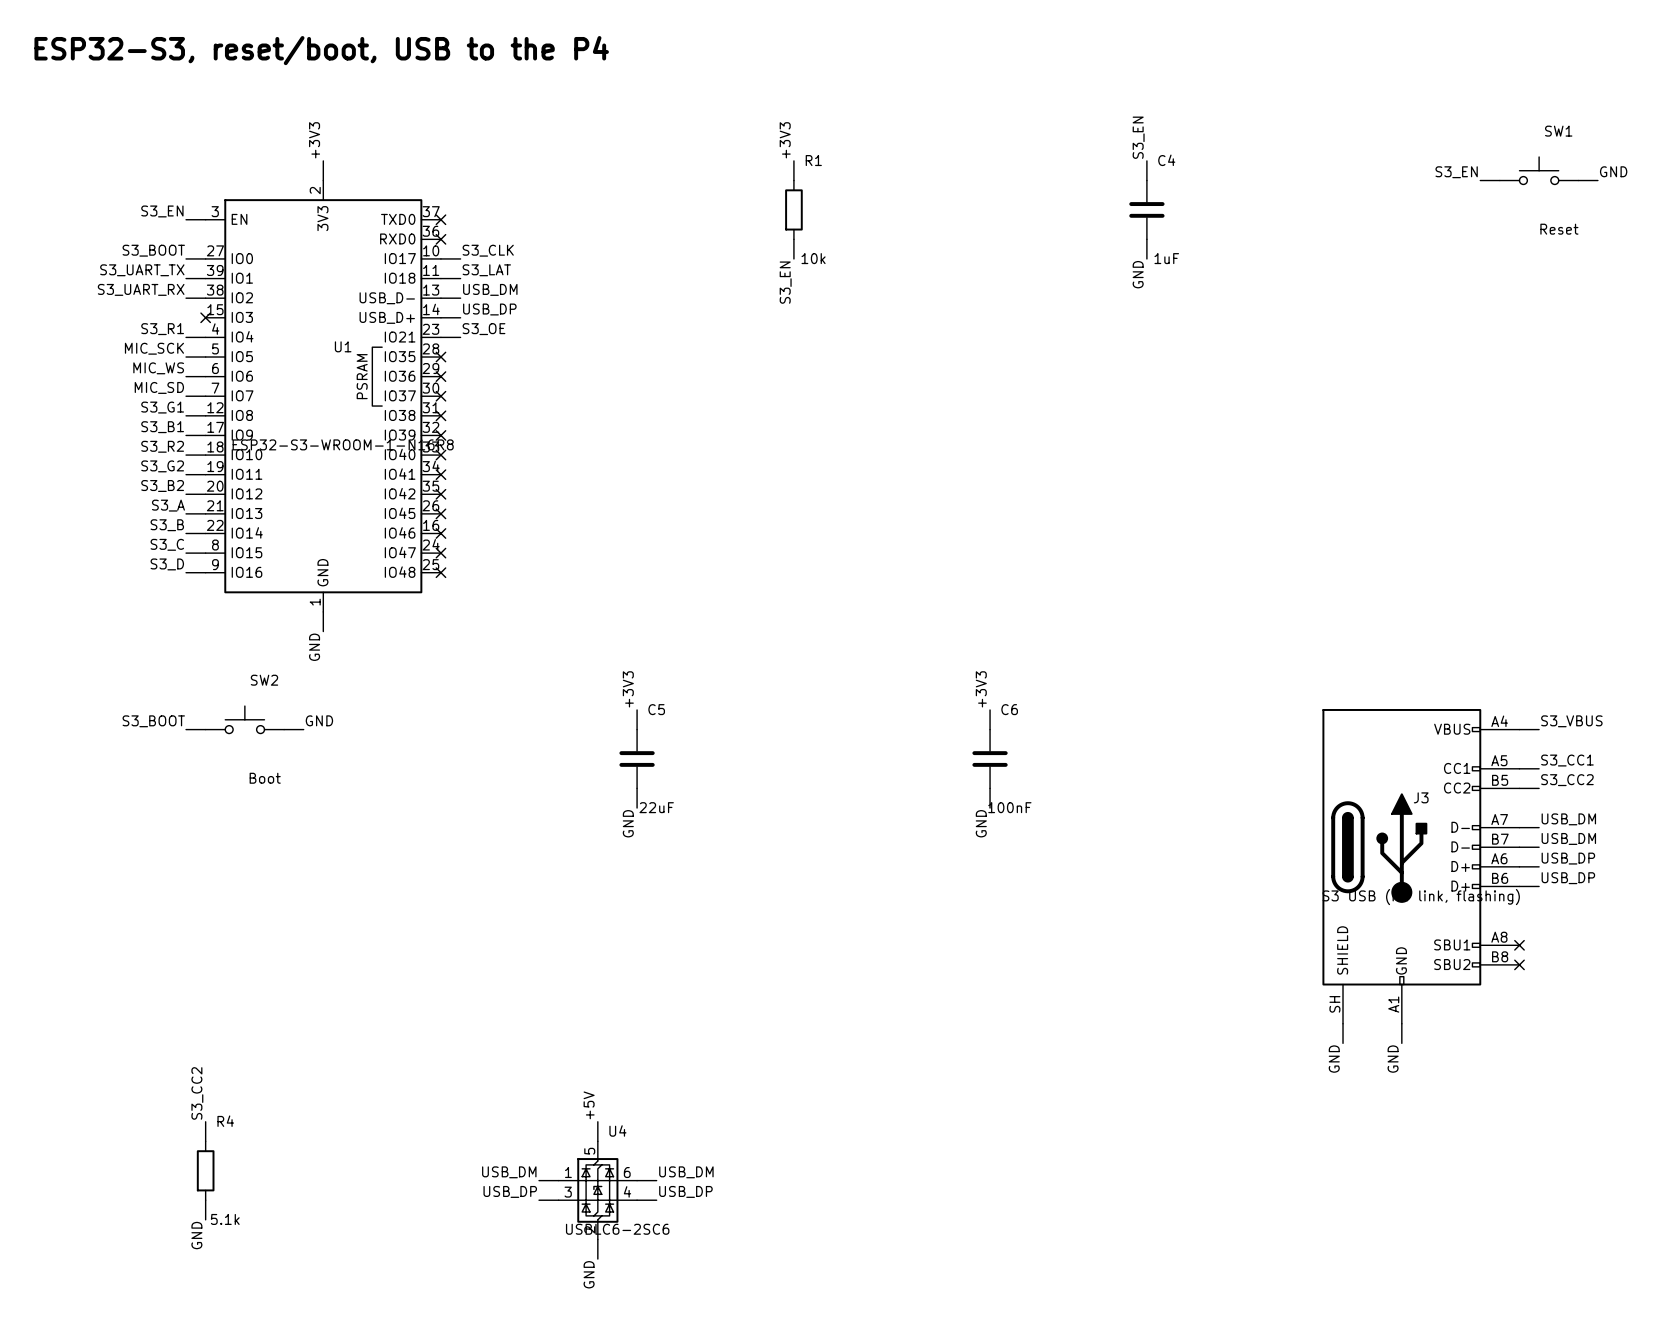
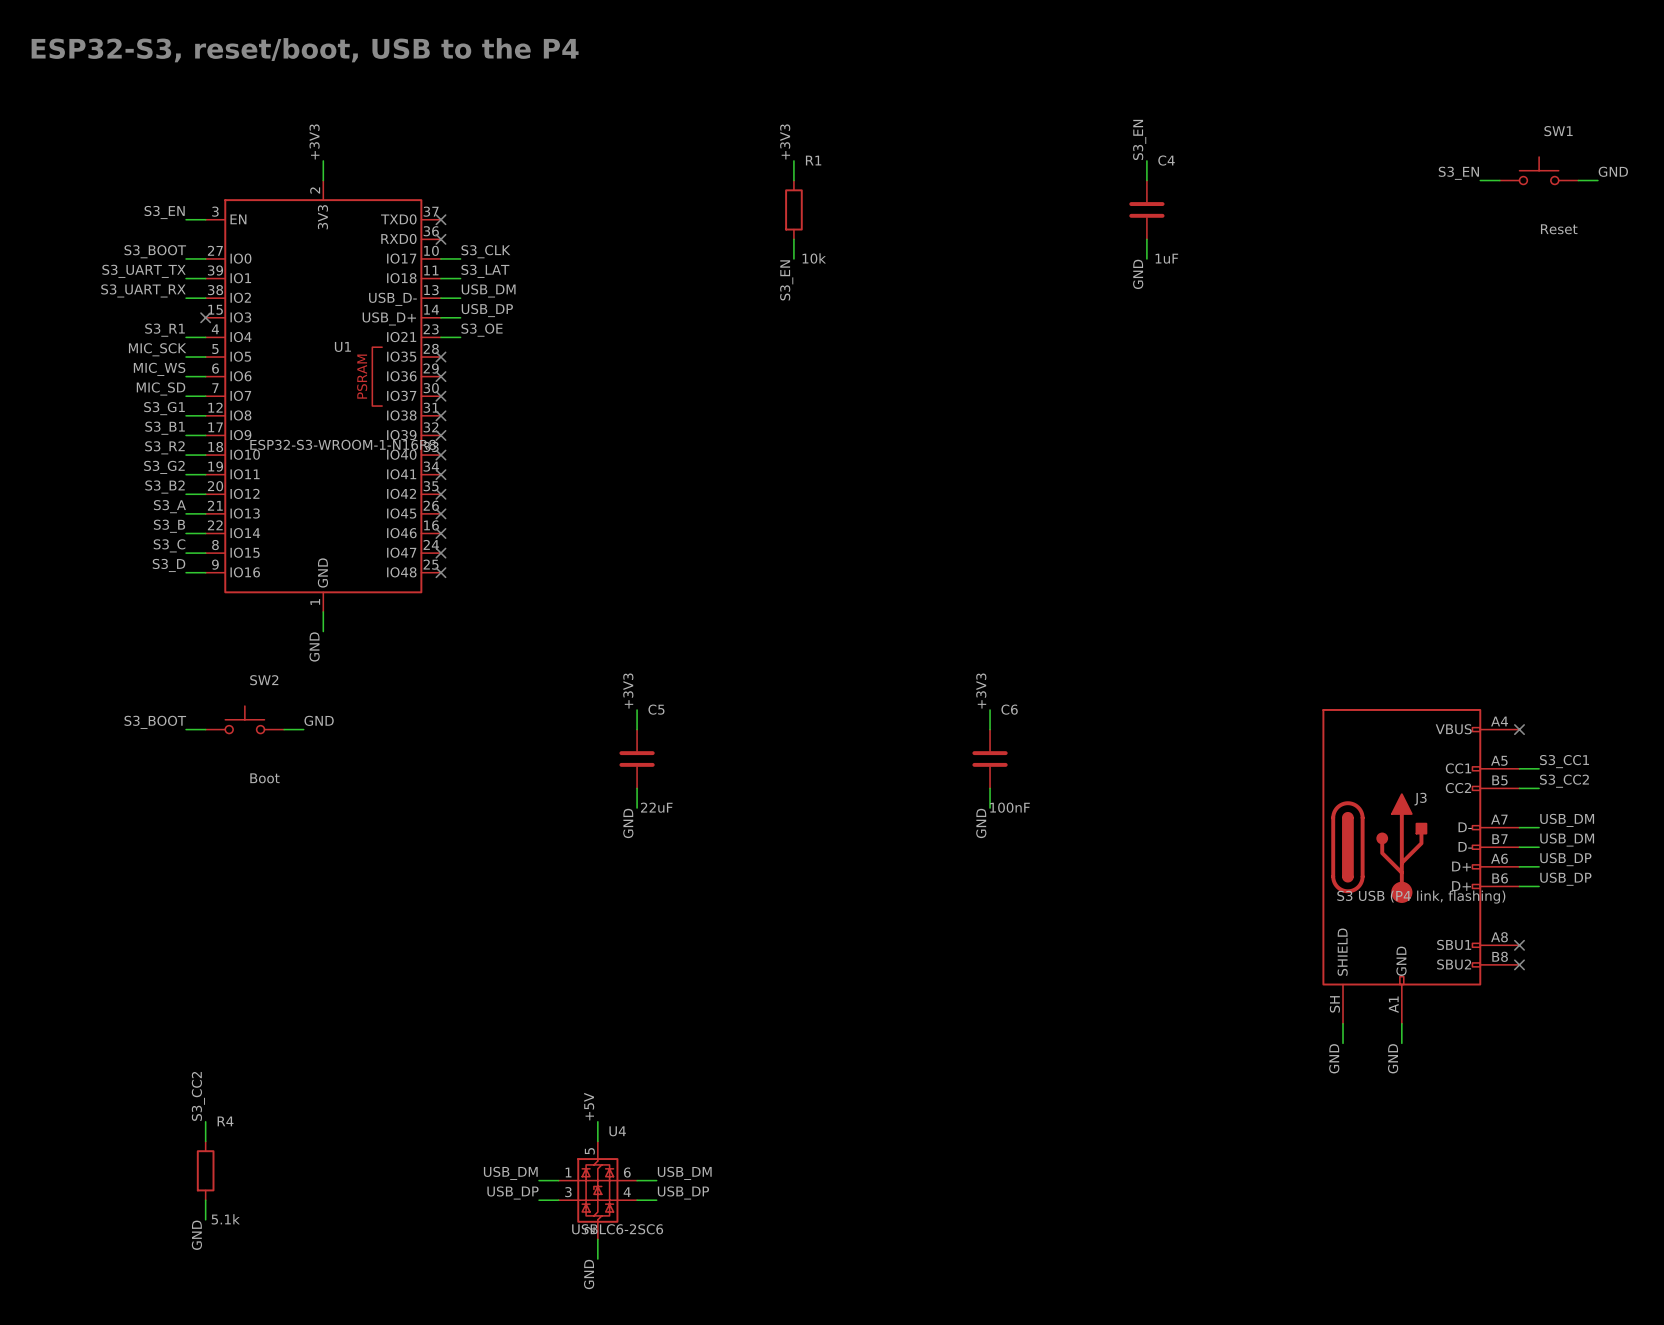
label: S3_VBUS (1571, 721) -> none
wire: (1519, 729) (1539, 729) -> none
no-connect mark: none -> (1519, 729)

